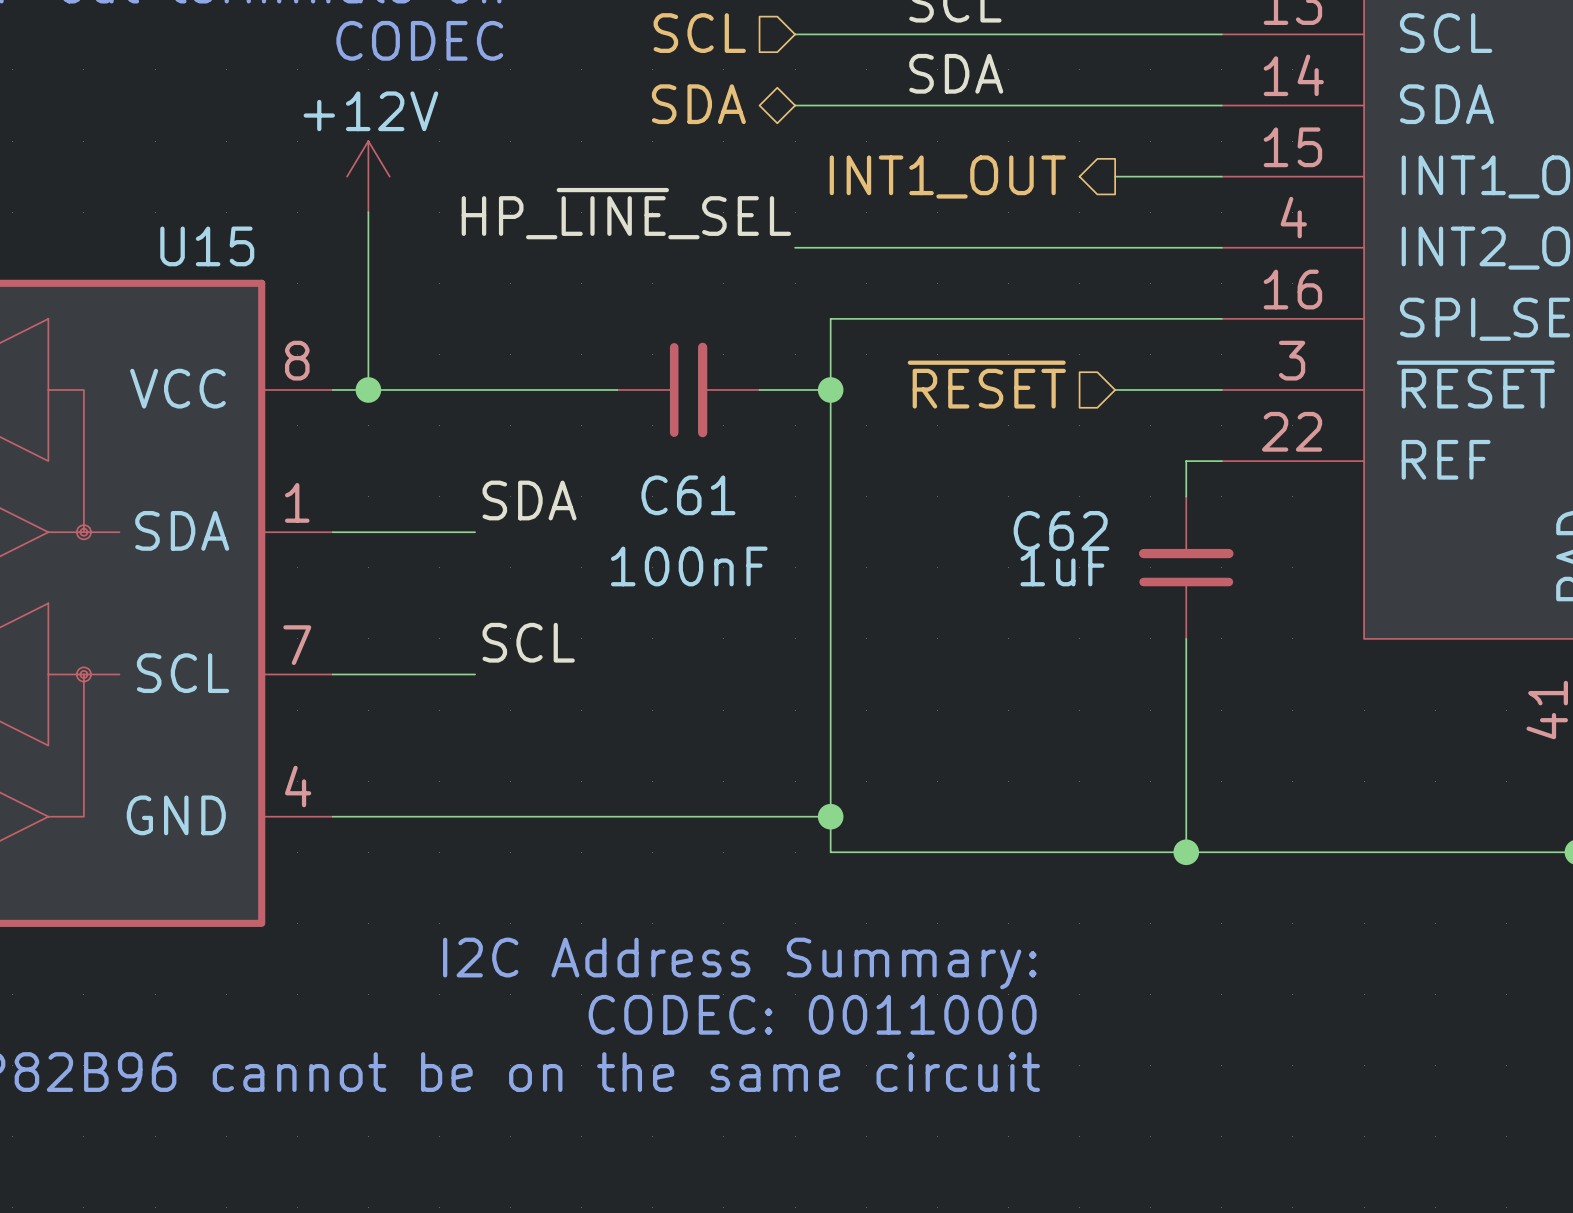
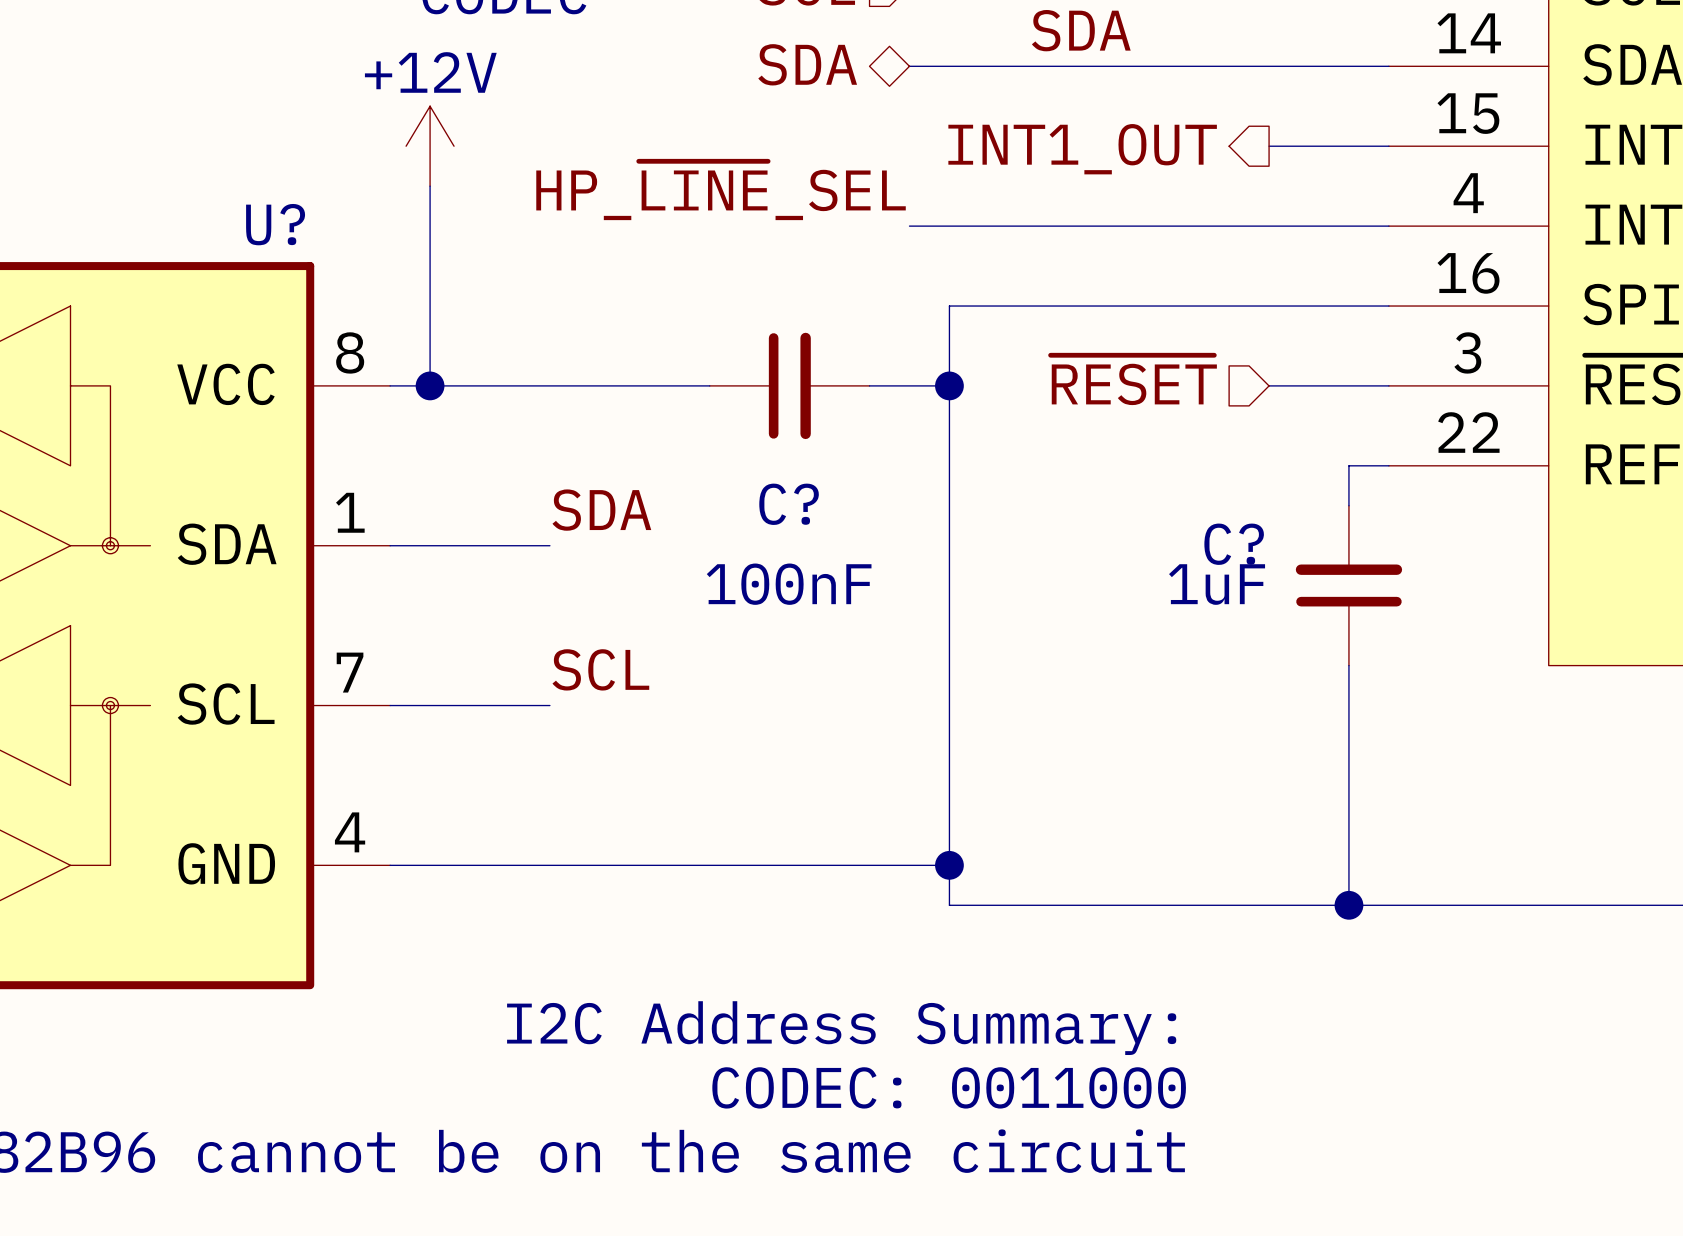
U15 name: U15 (207, 246) -> U? (275, 224)
C61 name: C61 (688, 495) -> C? (789, 504)
C62 name: C62 (1060, 530) -> C? (1234, 544)

